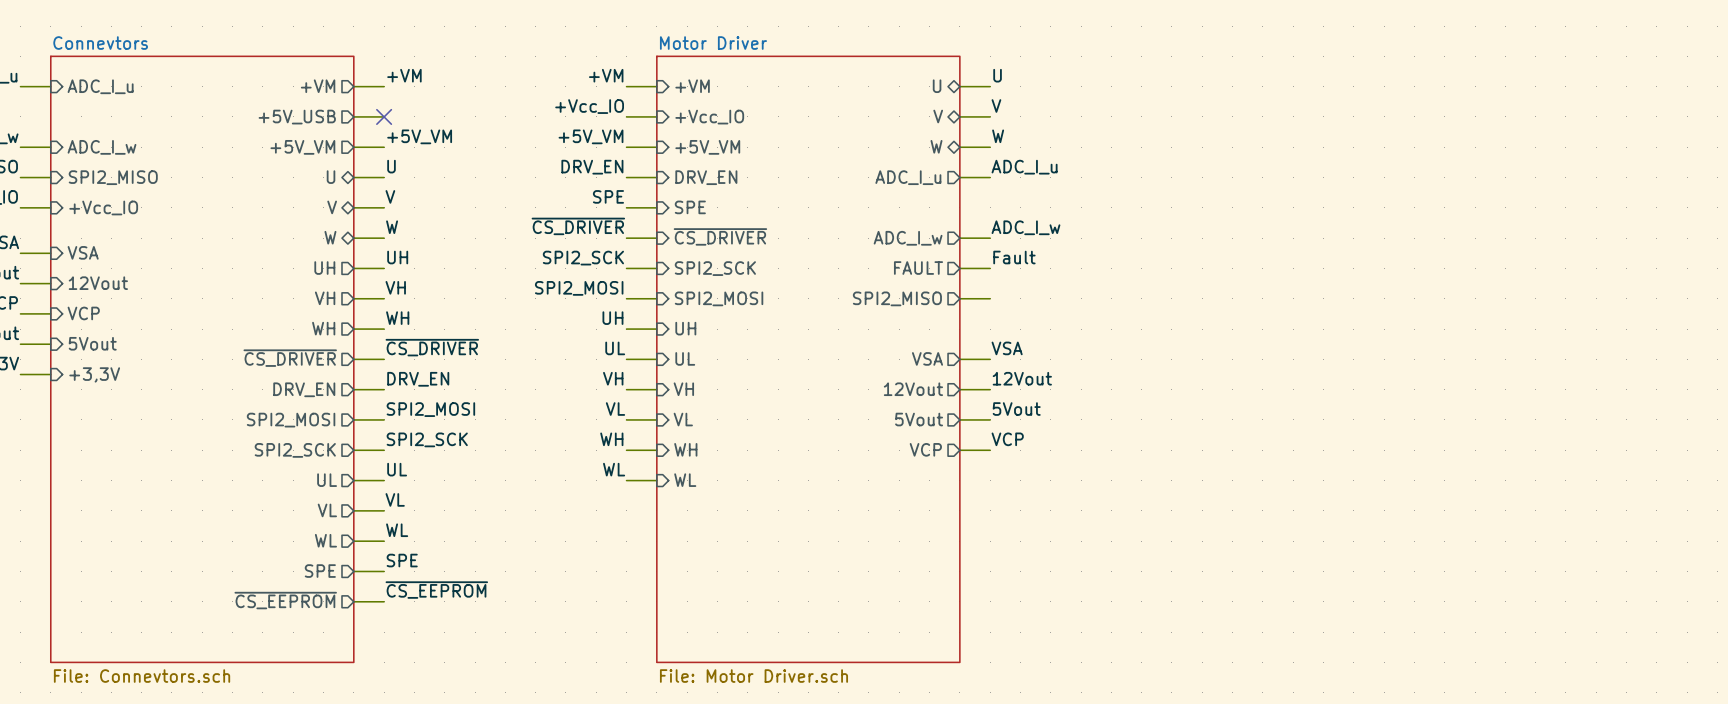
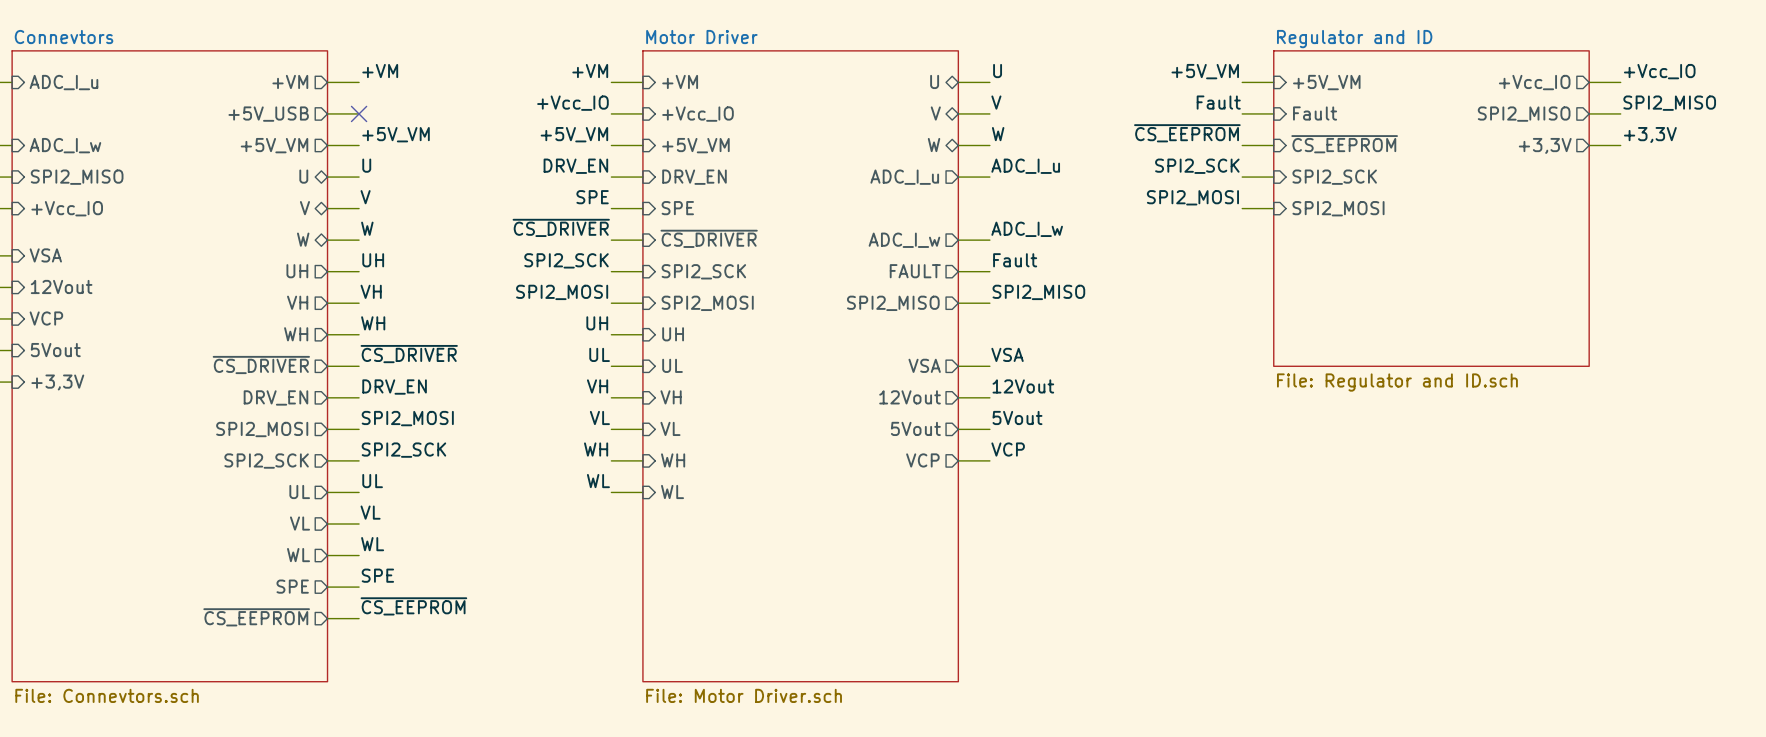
label: none -> +5V_VM (1205, 71)
label: none -> +Vcc_IO (1659, 71)
wire: none -> (1242, 82) (1273, 82)
sheet pin: none -> +5V_VM (1326, 82)
sheet pin: none -> +Vcc_IO (1534, 82)
wire: none -> (1589, 82) (1620, 82)
label: none -> Fault (1218, 102)
label: none -> SPI2_MISO (1669, 103)
wire: none -> (1242, 113) (1273, 113)
sheet pin: none -> Fault (1315, 113)
wire: none -> (1589, 113) (1620, 113)
sheet pin: none -> SPI2_MISO (1524, 114)
label: none -> ~{CS_EEPROM} (1187, 133)
label: none -> +3,3V (1650, 134)
sheet pin: none -> ~{CS_EEPROM} (1344, 144)
wire: none -> (1242, 145) (1273, 145)
sheet pin: none -> +3,3V (1545, 145)
wire: none -> (1589, 145) (1620, 145)
label: none -> SPI2_SCK (1197, 166)
wire: none -> (1242, 177) (1273, 177)
sheet pin: none -> SPI2_SCK (1334, 177)
label: none -> SPI2_MOSI (1192, 197)
wire: none -> (1242, 208) (1273, 208)
sheet pin: none -> SPI2_MOSI (1338, 208)
sheet Regulator and ID: none -> File: Regulator and ID.sch (1431, 208)
label: none -> SPI2_MISO (1038, 292)

